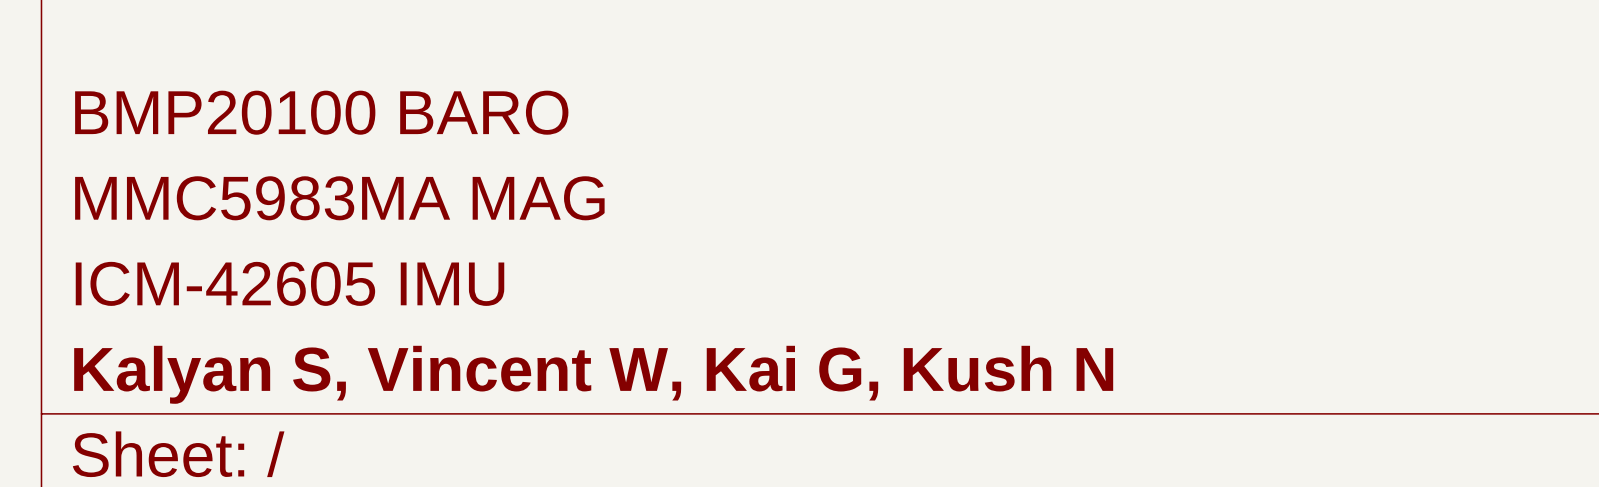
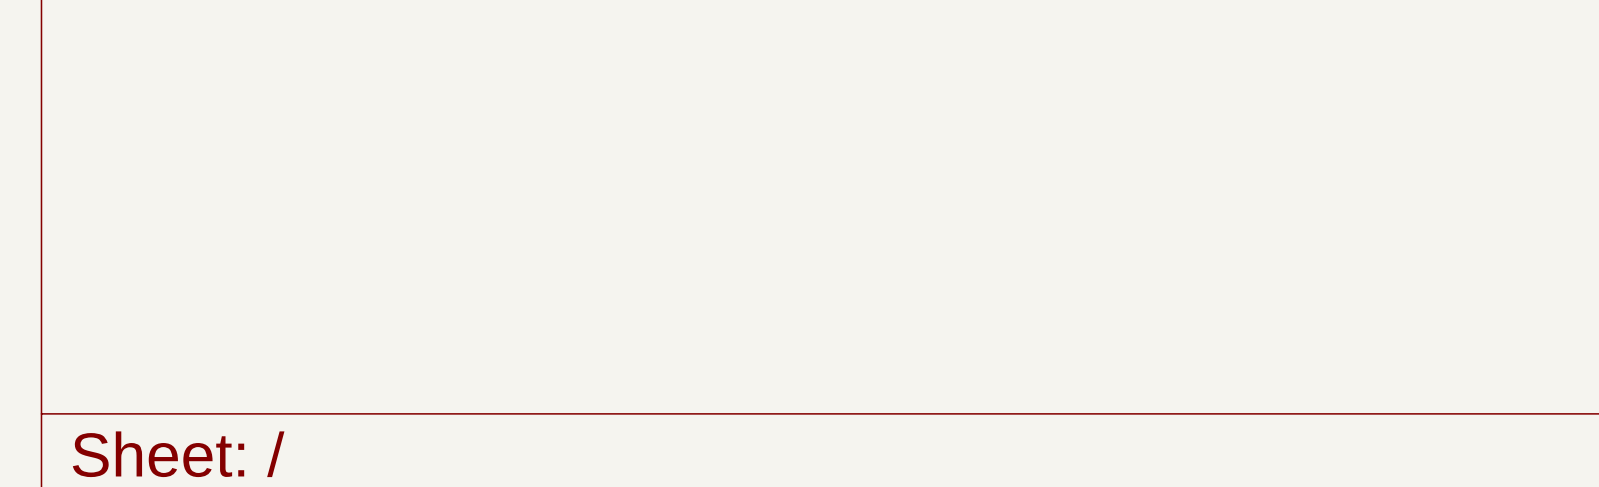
title block: BMP20100 BARO (321, 112) -> none
title block: MMC5983MA MAG (339, 198) -> none
title block: ICM-42605 IMU (290, 283) -> none
title block: Kalyan S, Vincent W, Kai G, Kush N (593, 374) -> none

